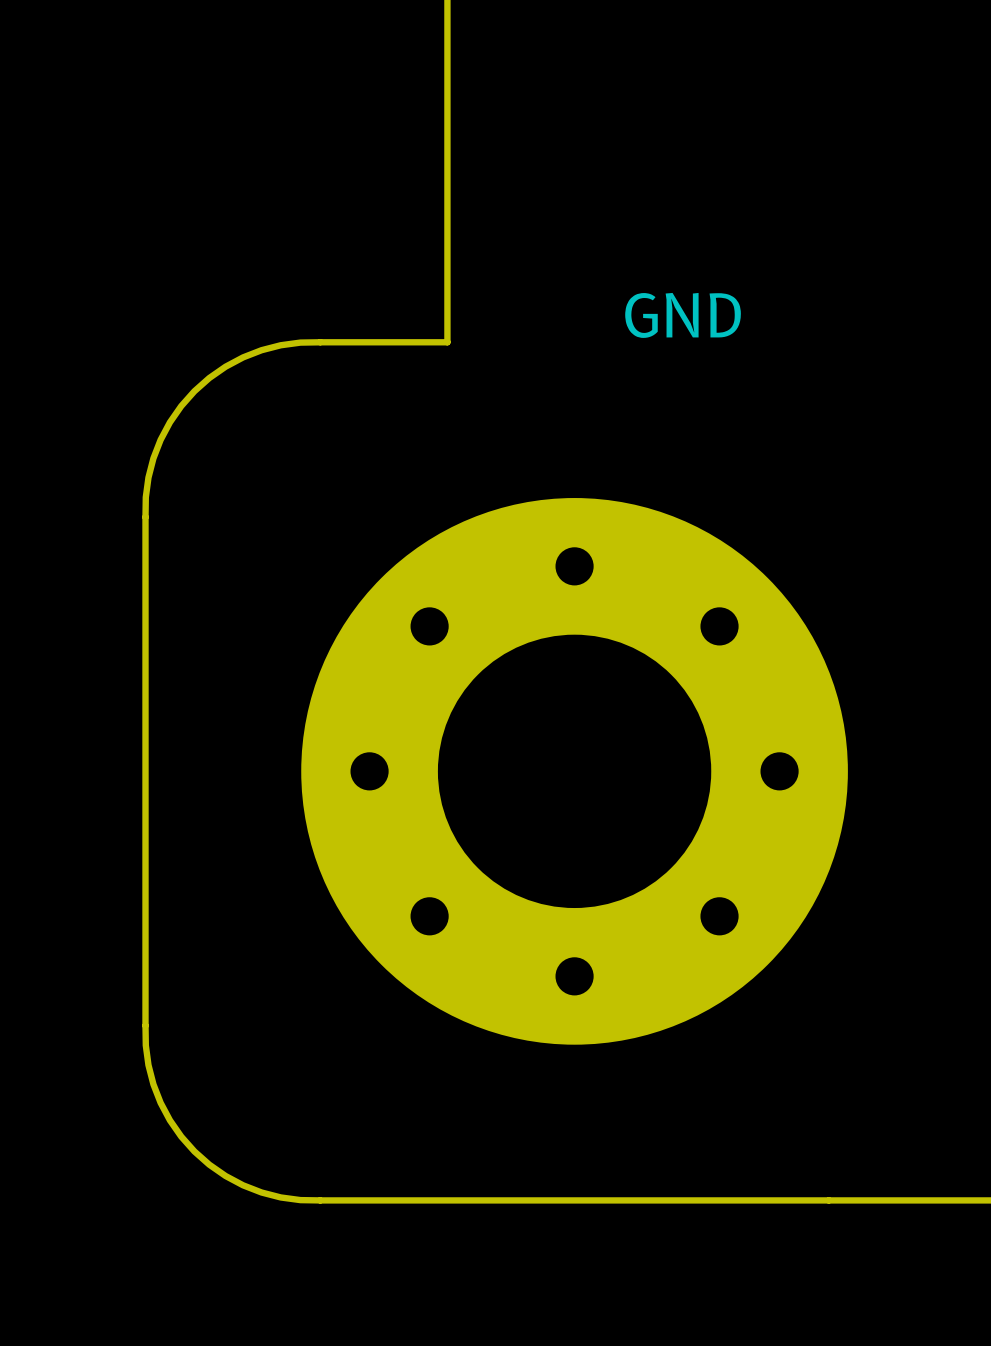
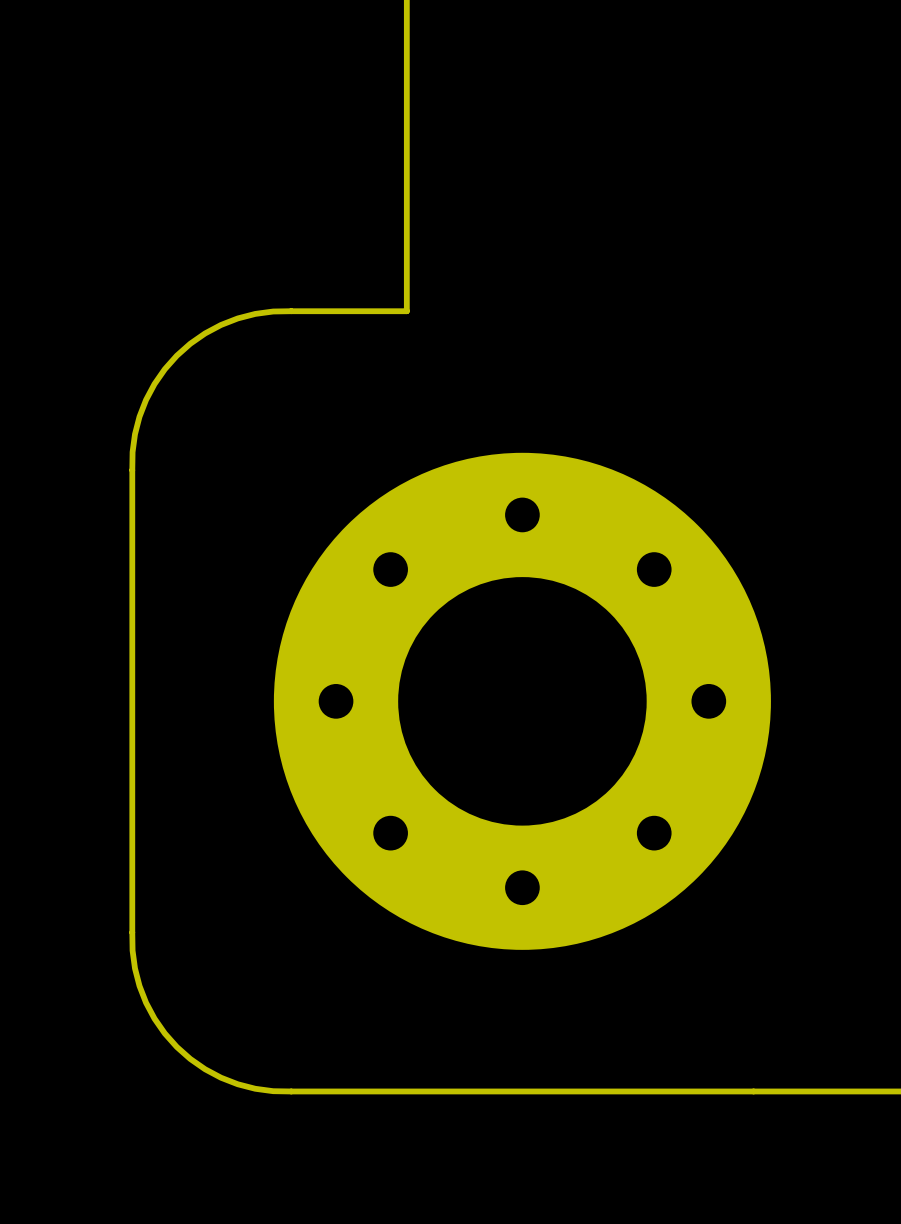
text: GND (683, 315) -> none

